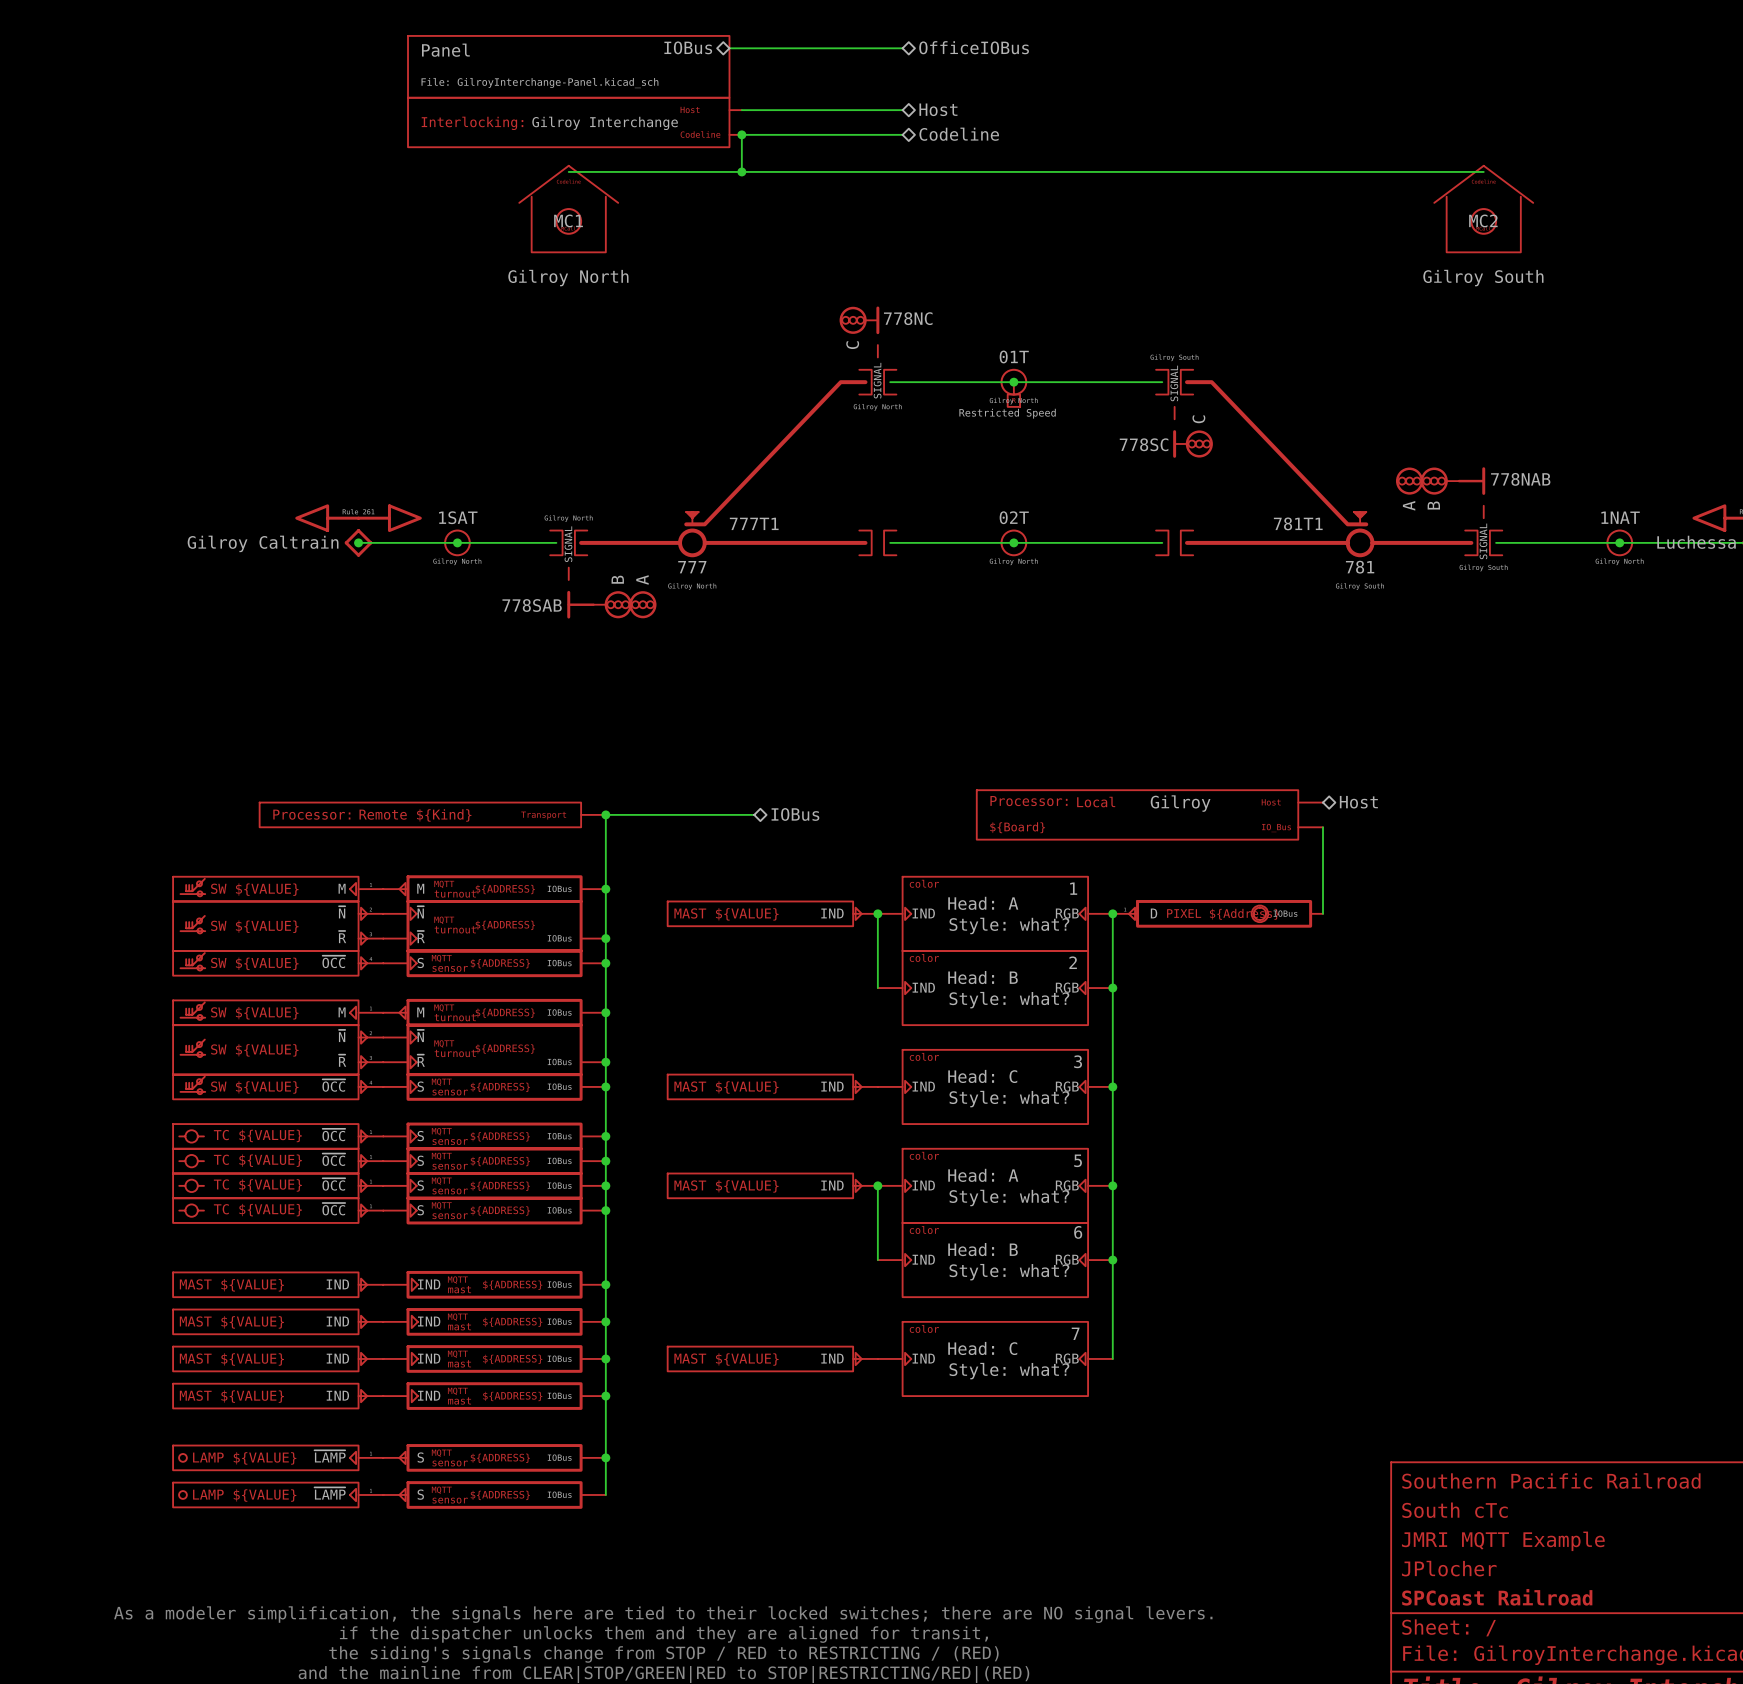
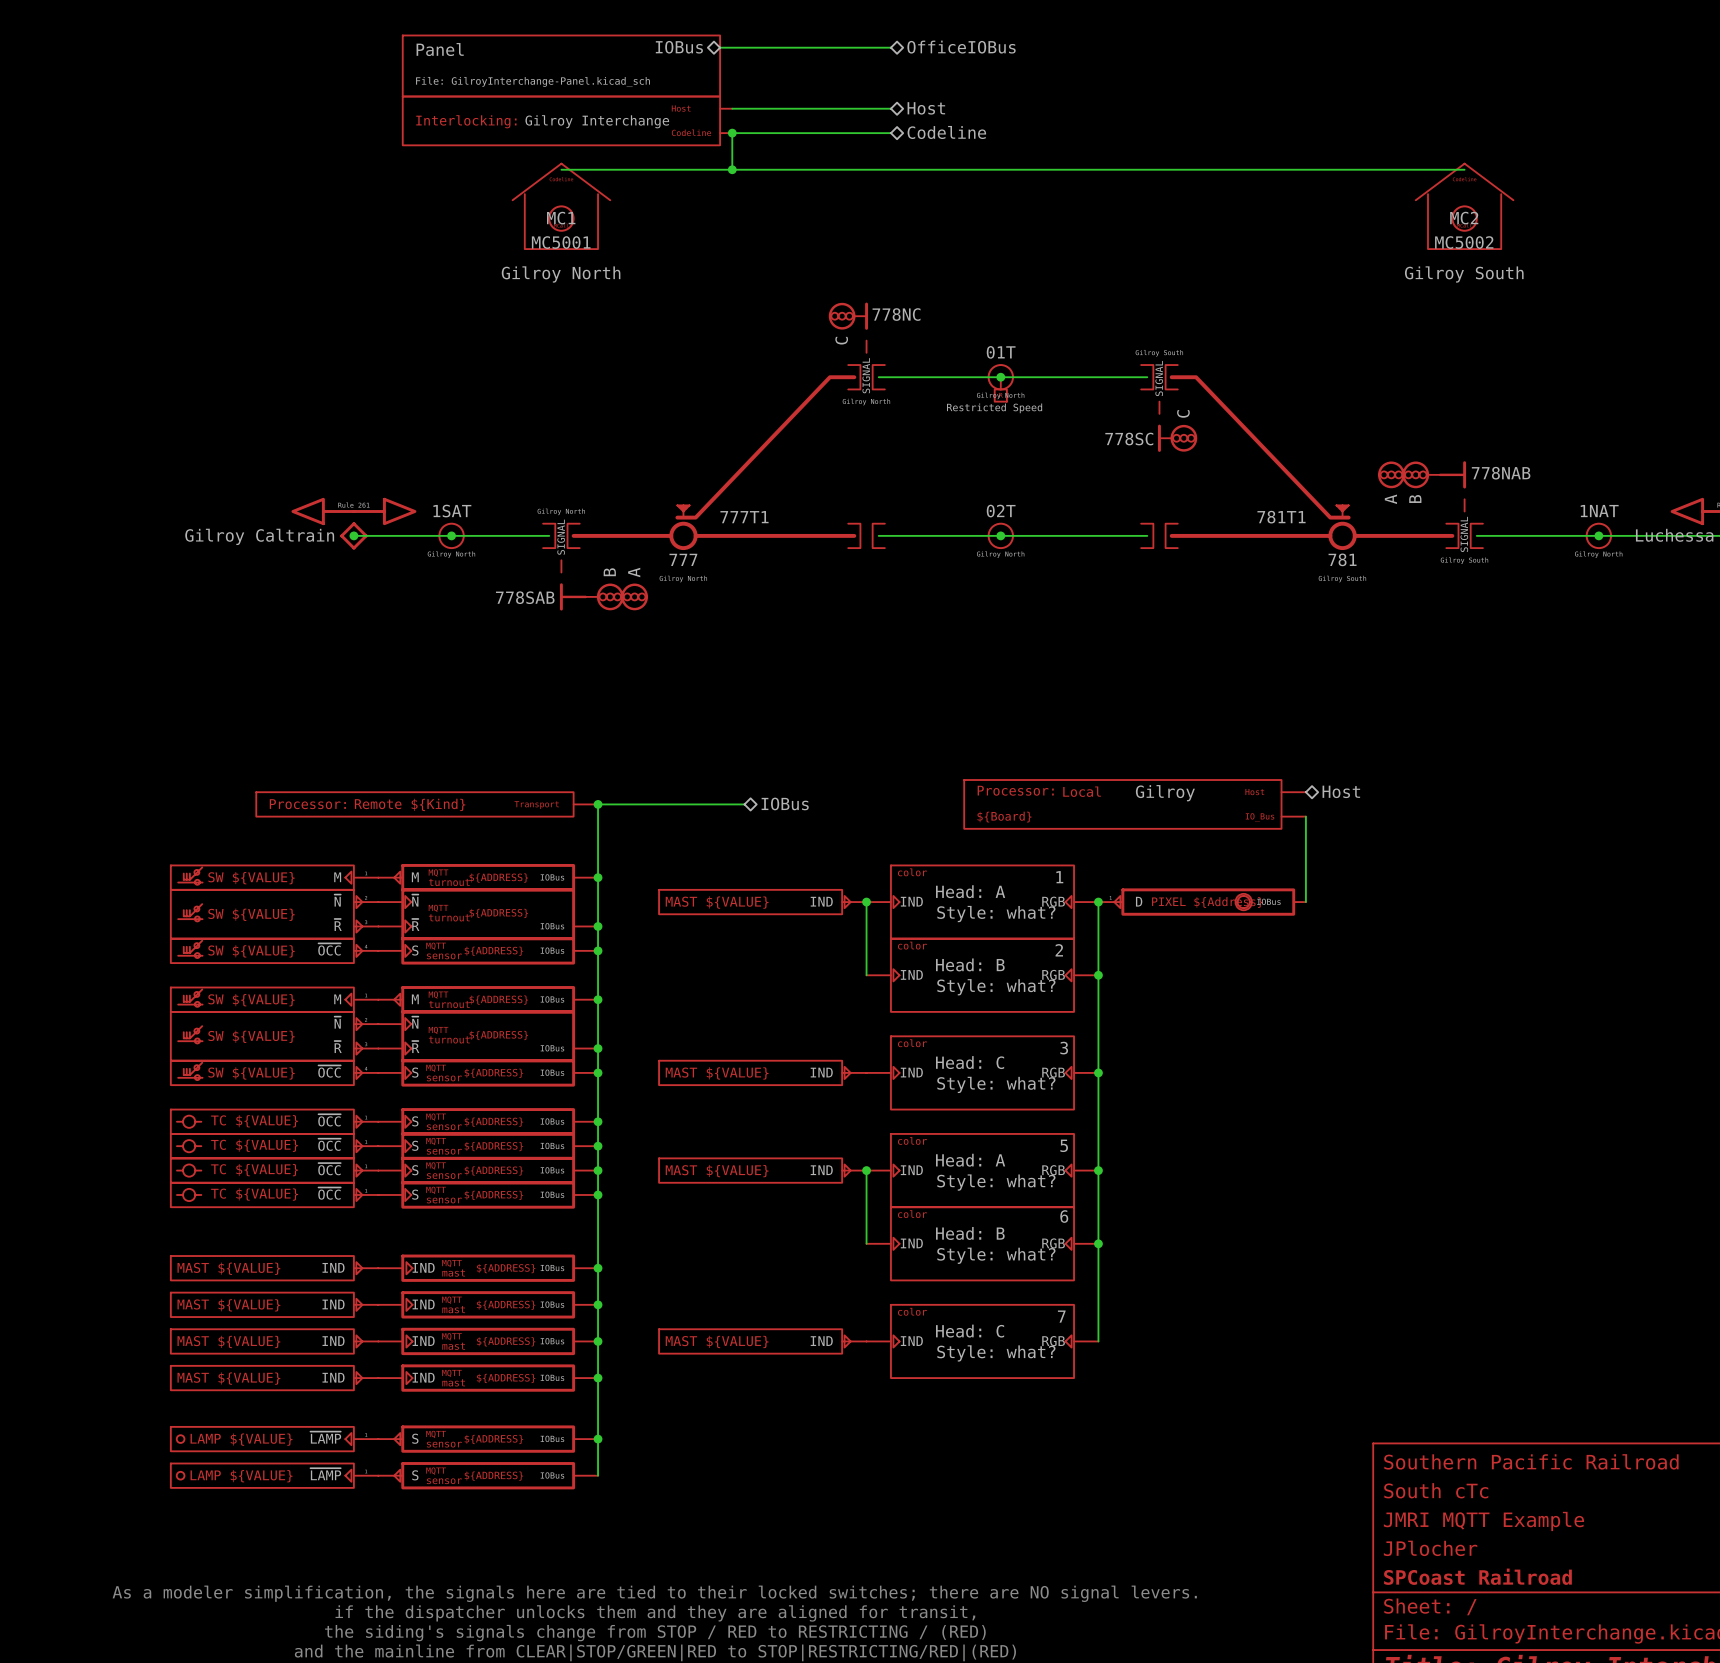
MC5001 name: none -> MC5001 (561, 242)
MC5002 name: none -> MC5002 (1464, 242)

